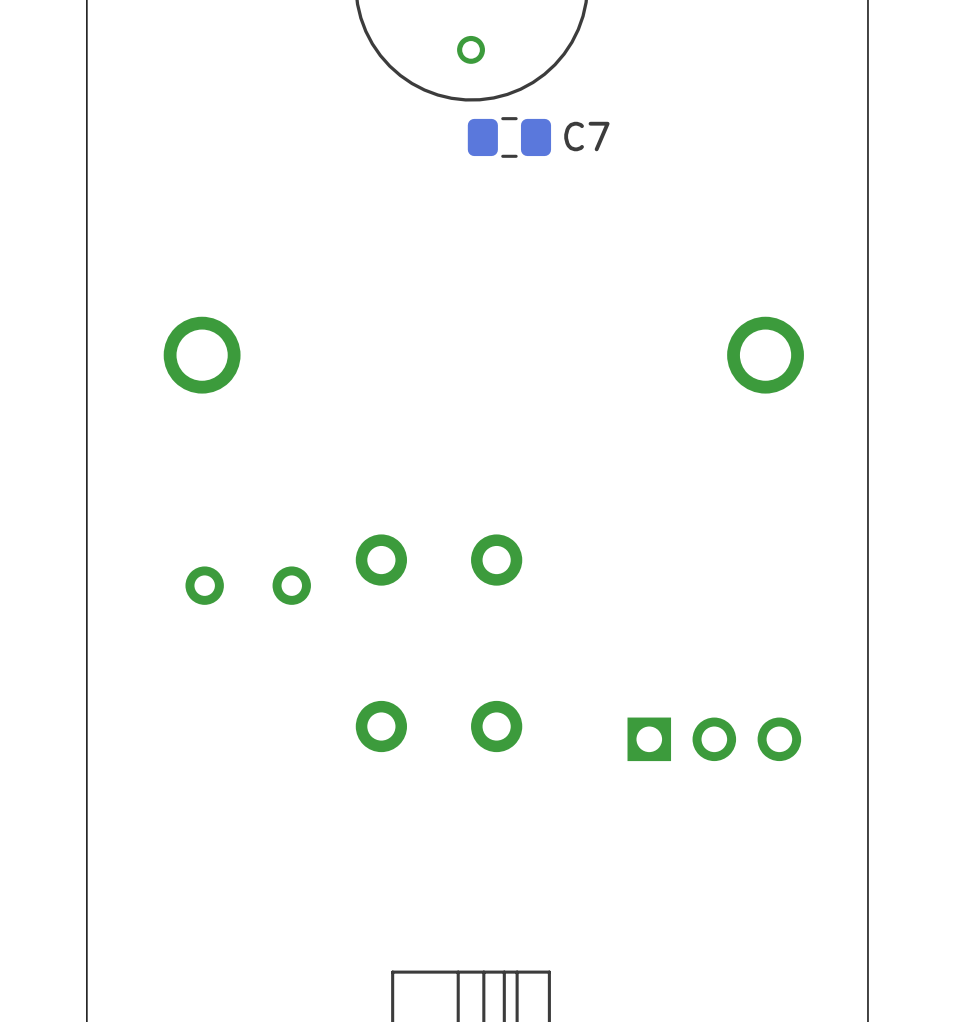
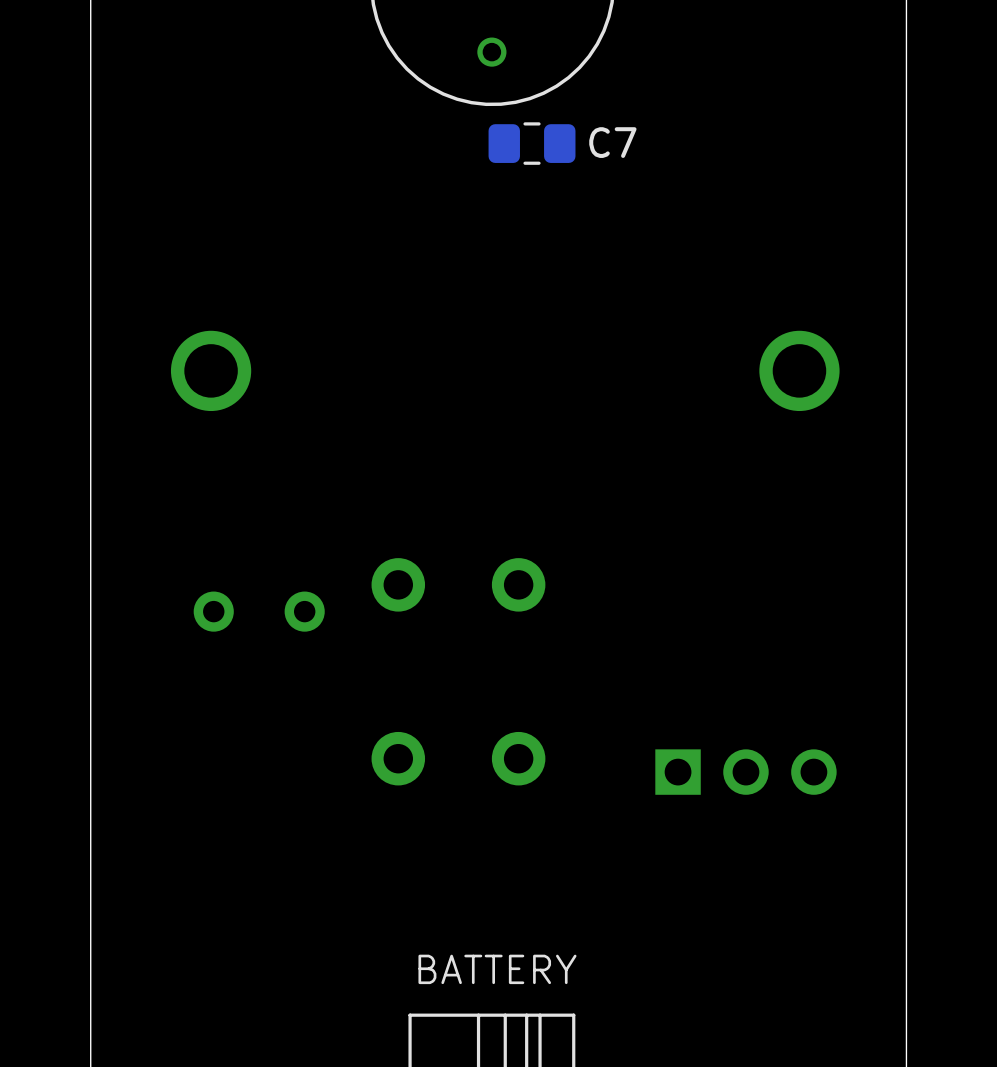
text: none -> BATTERY (497, 969)

